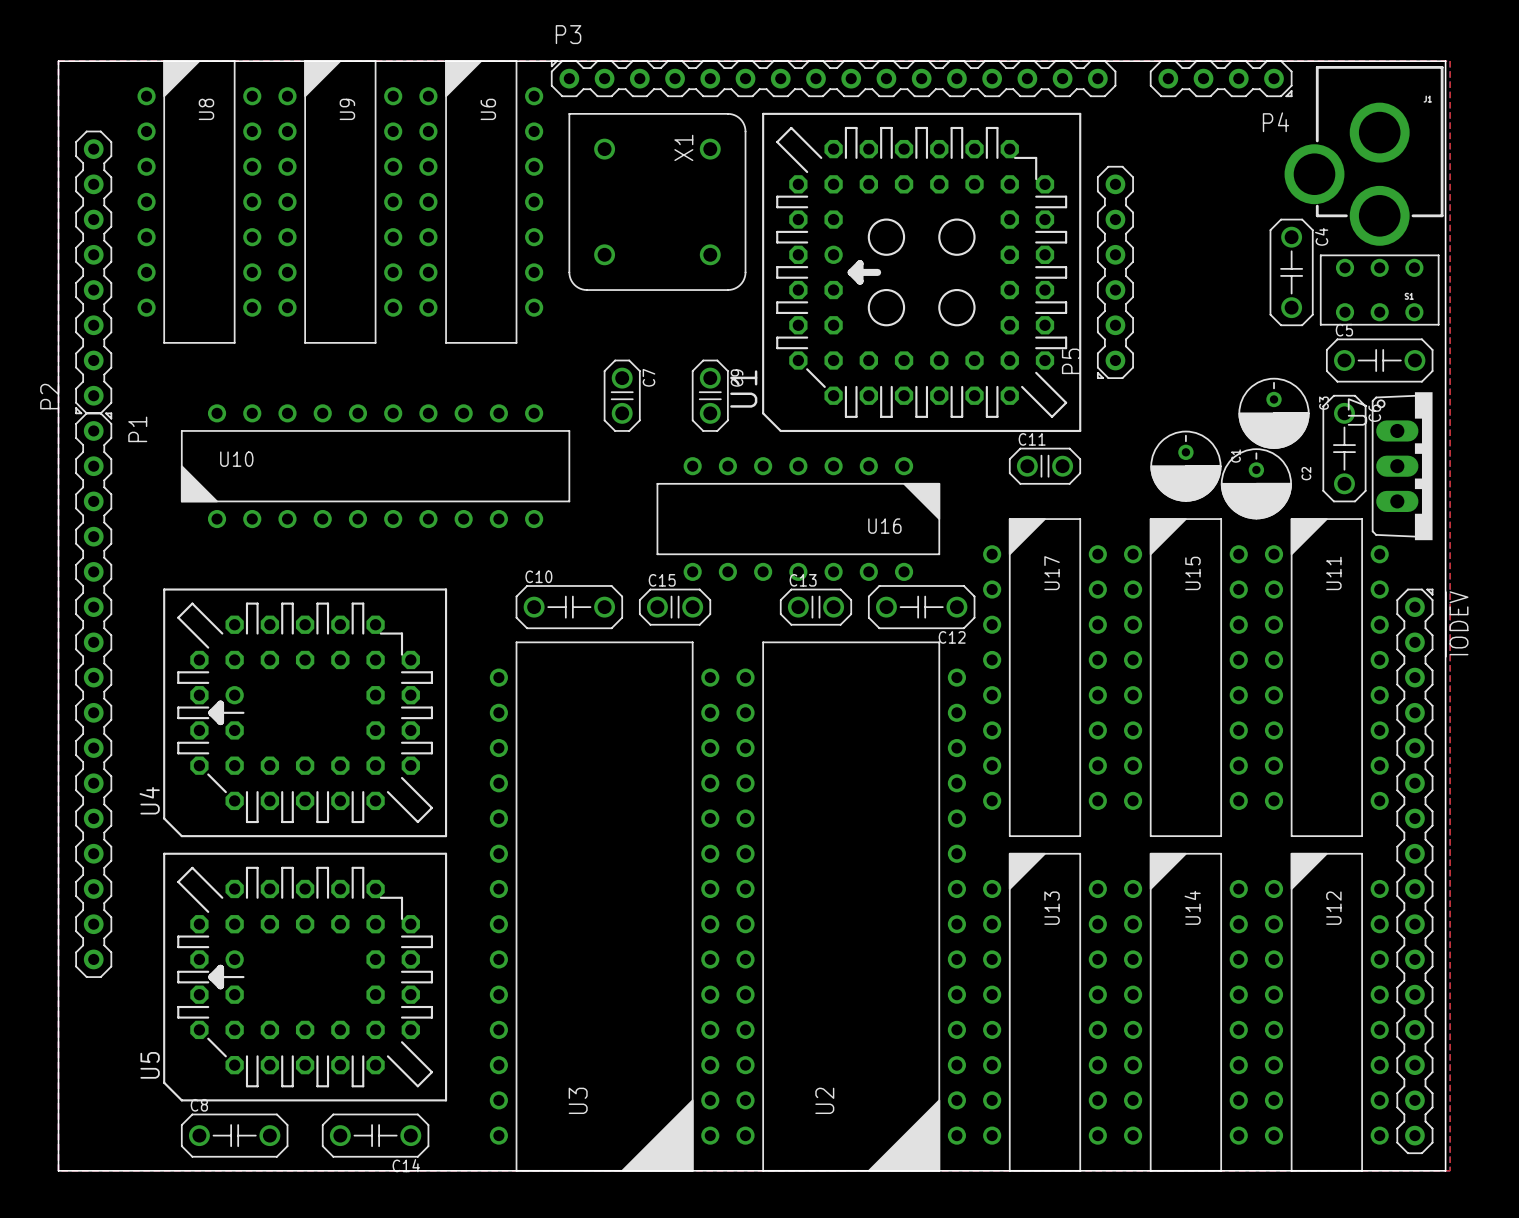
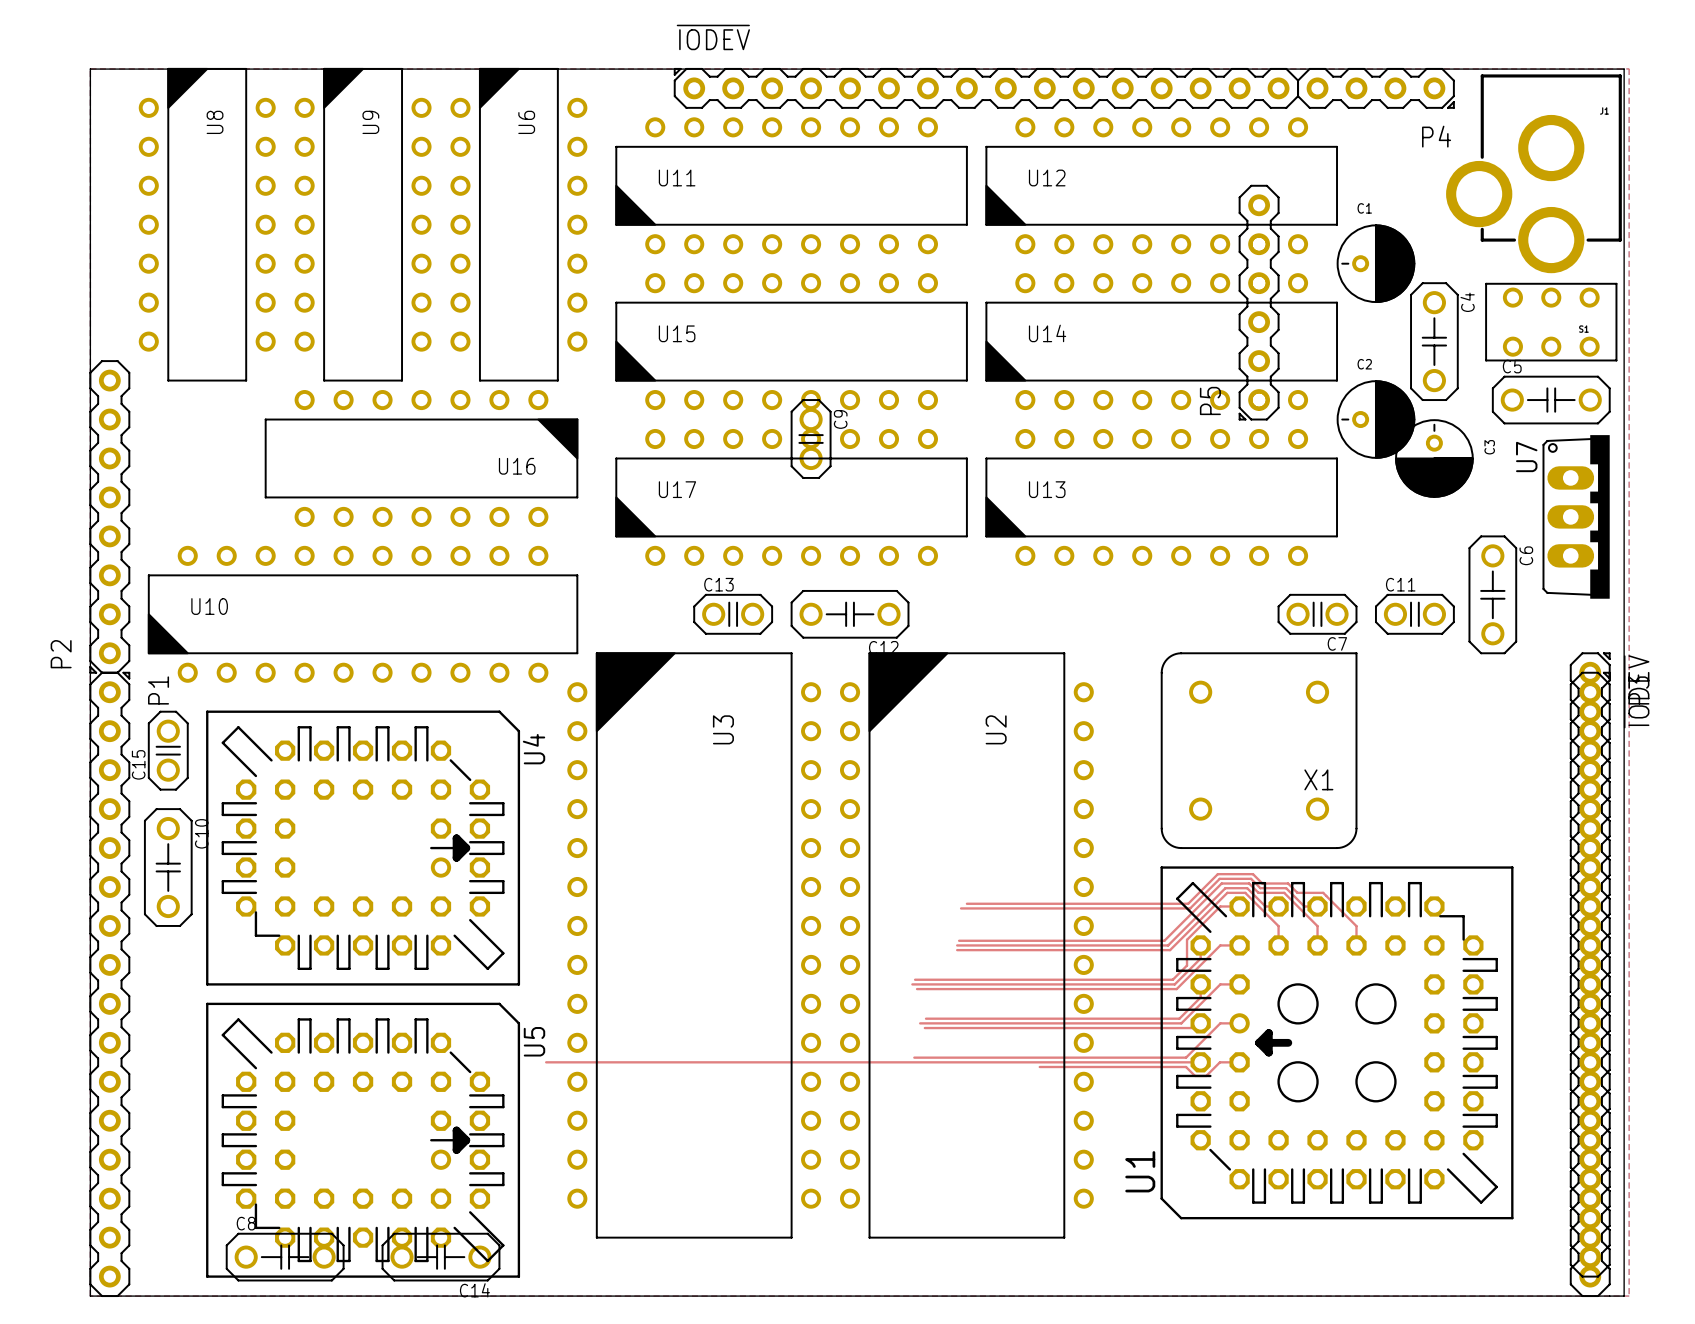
P3 rotation: 0° (833, 78) -> 90° clockwise (1590, 984)
P3 position: (833, 78) -> (1590, 984)
~{IODEV}: none -> (986, 88)
U8 position: (199, 201) -> (207, 224)
U9 position: (340, 201) -> (363, 224)
U6 position: (481, 201) -> (518, 224)
X1 rotation: 0° (657, 201) -> 90° clockwise (1259, 750)
X1 position: (657, 201) -> (1259, 750)
P2 position: (93, 272) -> (109, 516)
U1 position: (921, 272) -> (1337, 1042)
C4 position: (1291, 272) -> (1434, 341)
C7 rotation: 0° (622, 395) -> 90° clockwise (1317, 614)
C7 position: (622, 395) -> (1317, 614)
C6 position: (1344, 448) -> (1492, 594)
U10 position: (375, 466) -> (363, 614)
C11 position: (1044, 466) -> (1414, 614)
C1 rotation: 0° (1185, 466) -> 90° counterclockwise (1375, 263)
C1 position: (1185, 466) -> (1375, 263)
C2 rotation: 0° (1256, 483) -> 90° counterclockwise (1375, 419)
C2 position: (1256, 483) -> (1375, 419)
U16 position: (798, 519) -> (421, 458)
C15 name position: C15 (662, 580) -> C15 (138, 764)
C10 rotation: 0° (569, 607) -> 90° clockwise (168, 867)
C10 position: (569, 607) -> (168, 867)
C15 rotation: 0° (675, 607) -> 90° clockwise (168, 750)
C15 position: (675, 607) -> (168, 750)
C13 position: (815, 607) -> (733, 614)
C12 position: (921, 607) -> (850, 614)
U17 rotation: 0° (1044, 677) -> 90° counterclockwise (791, 497)
U17 position: (1044, 677) -> (791, 497)
U15 rotation: 0° (1185, 677) -> 90° counterclockwise (791, 341)
U15 position: (1185, 677) -> (791, 341)
U11 rotation: 0° (1326, 677) -> 90° counterclockwise (791, 185)
U11 position: (1326, 677) -> (791, 185)
P1 position: (93, 695) -> (109, 984)
U4 rotation: 0° (305, 712) -> 180° (363, 848)
top track: none -> (966, 903) (1188, 903) (1217, 874) (1253, 874) (1262, 883) (1288, 883) (1297, 892) (1323, 892) (1356, 926) (1356, 945)
top track: none -> (1239, 906) (1220, 906) (1187, 939) (1187, 965) (1172, 979) (915, 979)
top track: none -> (1278, 906) (1265, 906) (1247, 888) (1225, 888) (1168, 945) (957, 945)
top track: none -> (1317, 906) (1304, 906) (1286, 888) (1260, 888) (1251, 878) (1219, 878) (1190, 908) (961, 908)
top track: none -> (959, 940) (1164, 940) (1221, 883) (1249, 883) (1258, 892) (1284, 892) (1317, 926) (1317, 945)
top track: none -> (1200, 945) (1200, 958) (1174, 984) (912, 984)
top track: none -> (1239, 945) (1220, 945) (1176, 989) (917, 989)
top track: none -> (1278, 945) (1278, 926) (1245, 892) (1227, 892) (1170, 950) (957, 950)
top track: none -> (1200, 984) (1200, 997) (1179, 1018) (926, 1018)
top track: none -> (1239, 984) (1220, 984) (1181, 1023) (920, 1023)
U3 rotation: 0° (604, 906) -> 180° (694, 945)
U2 rotation: 0° (851, 906) -> 180° (966, 945)
top track: none -> (1200, 1023) (1195, 1028) (924, 1028)
top track: none -> (1239, 1023) (1220, 1023) (1186, 1057) (914, 1057)
top track: none -> (546, 1062) (1200, 1062)
top track: none -> (1239, 1062) (1219, 1062) (1206, 1075) (1195, 1075) (1186, 1067) (1039, 1067)
U5 rotation: 0° (305, 977) -> 180° (363, 1140)
U13 rotation: 0° (1044, 1012) -> 90° counterclockwise (1161, 497)
U13 position: (1044, 1012) -> (1161, 497)
U14 rotation: 0° (1185, 1012) -> 90° counterclockwise (1161, 341)
U14 position: (1185, 1012) -> (1161, 341)
U12 rotation: 0° (1326, 1012) -> 90° counterclockwise (1161, 185)
U12 position: (1326, 1012) -> (1161, 185)

